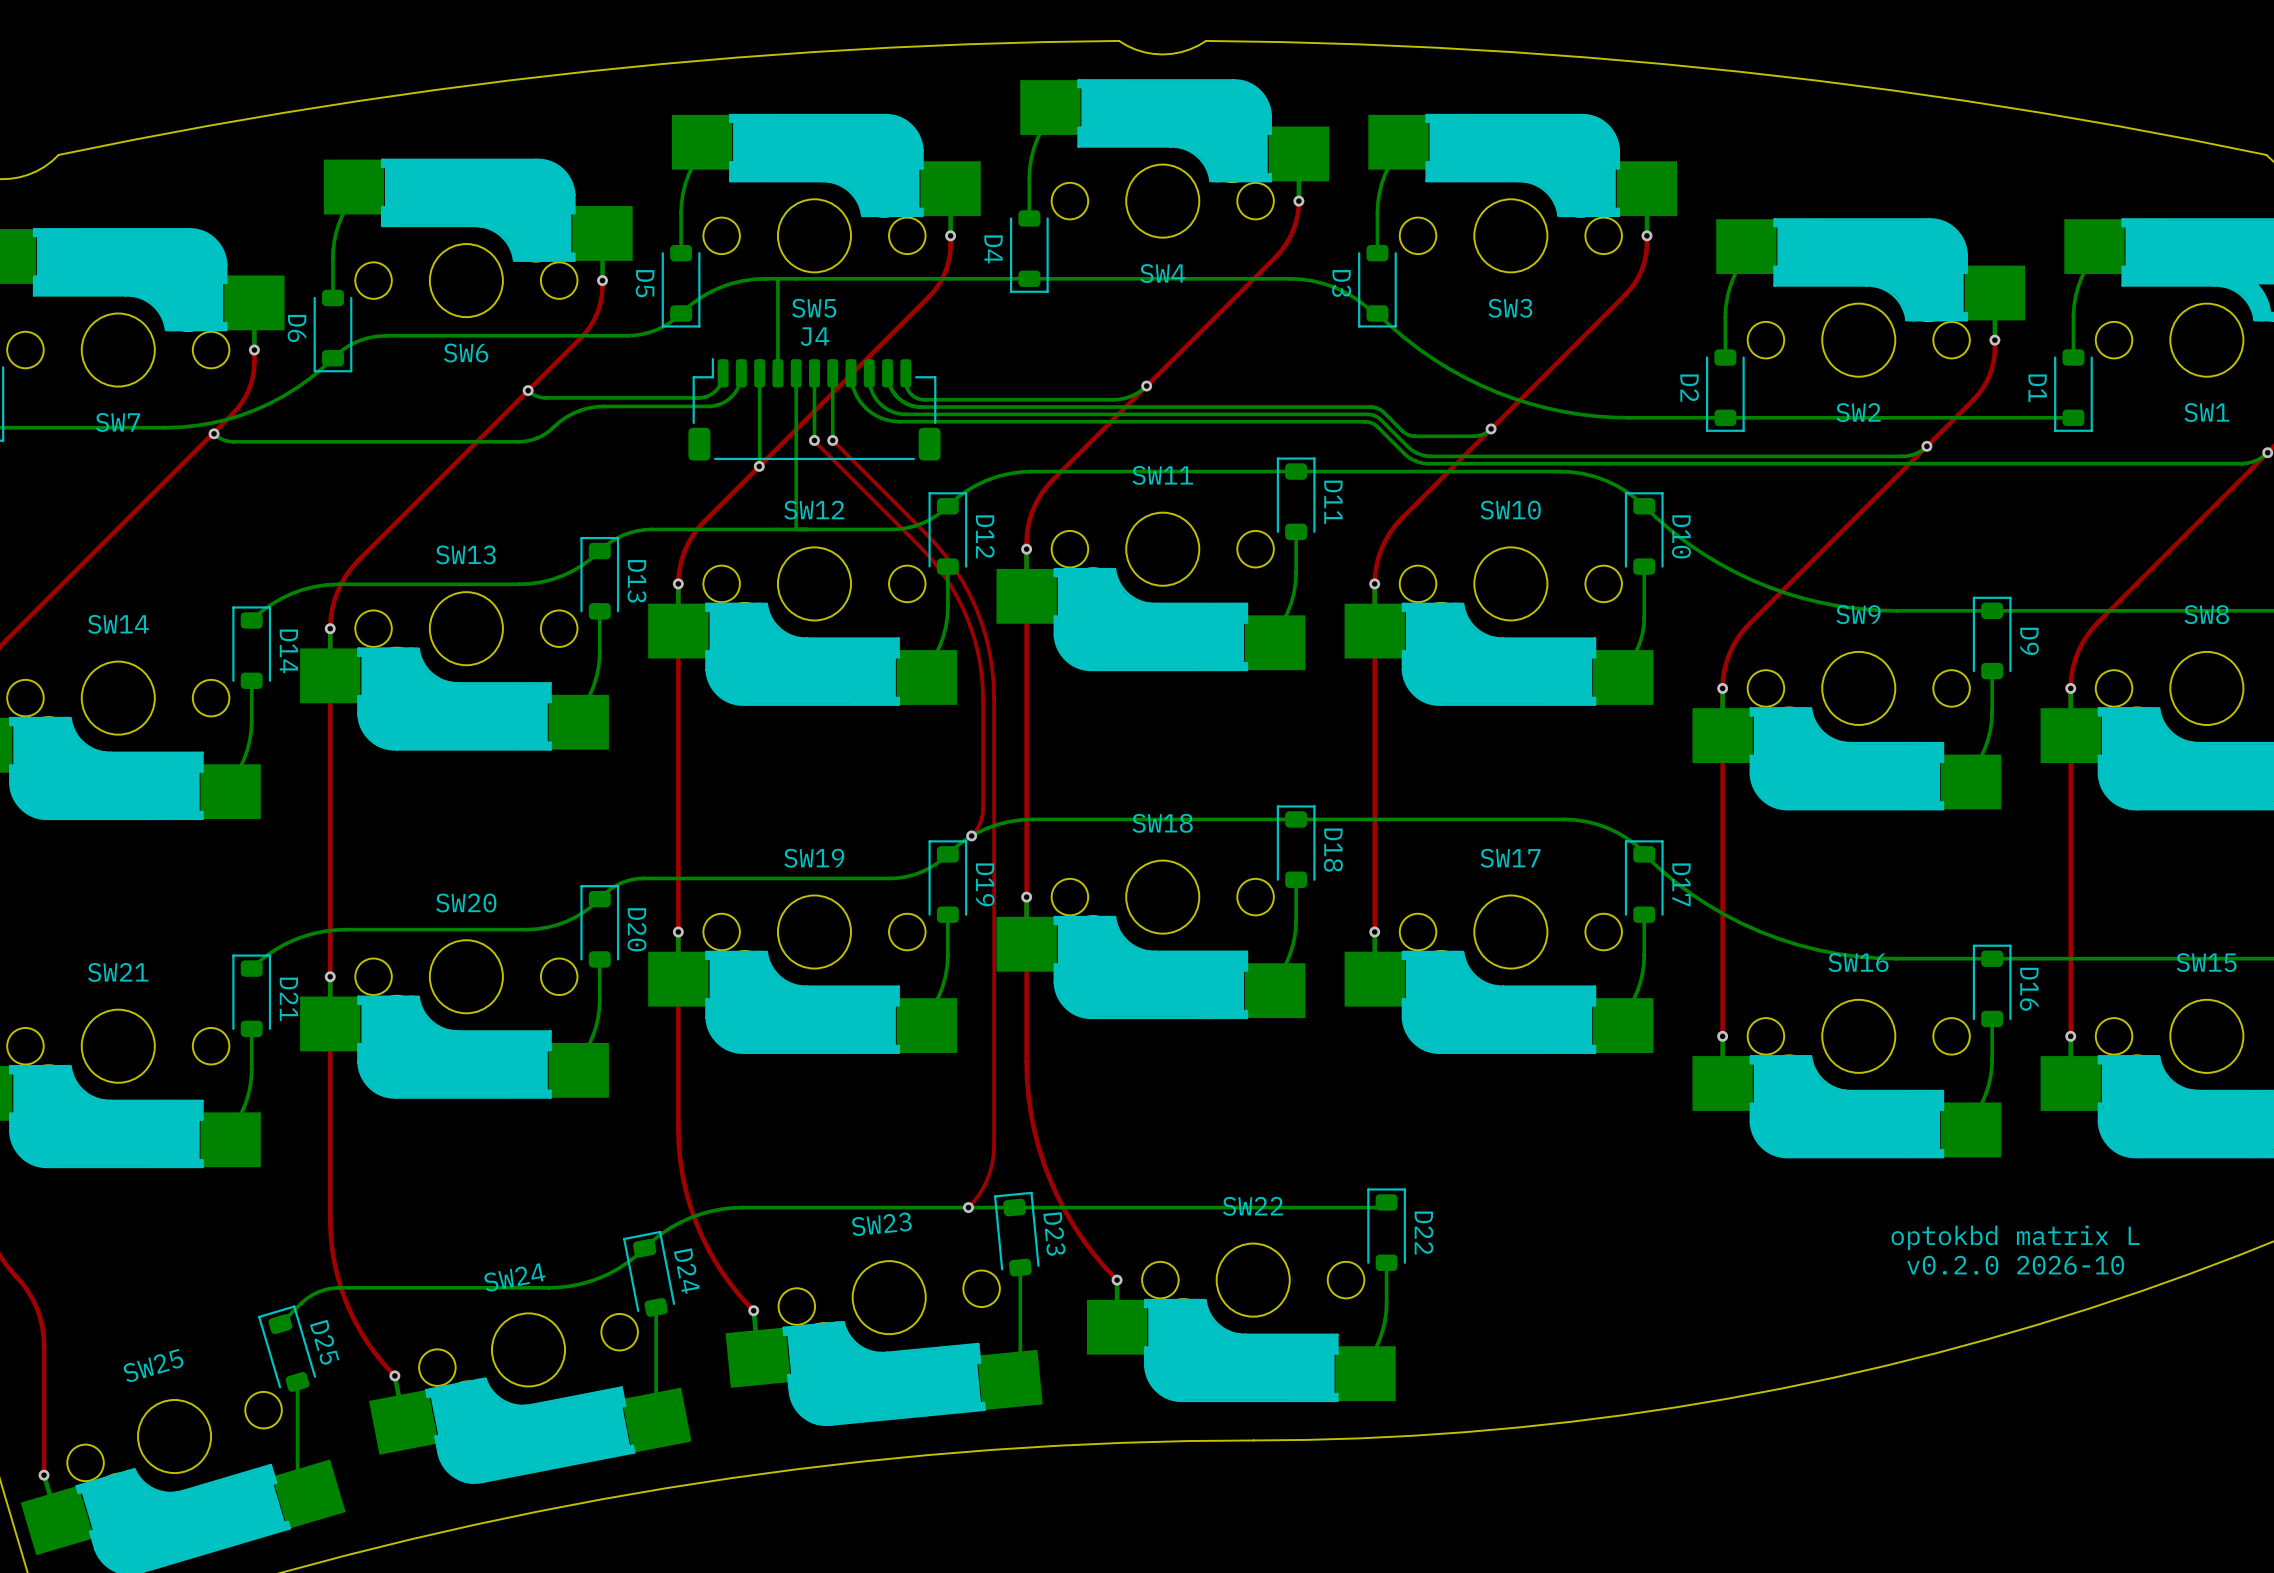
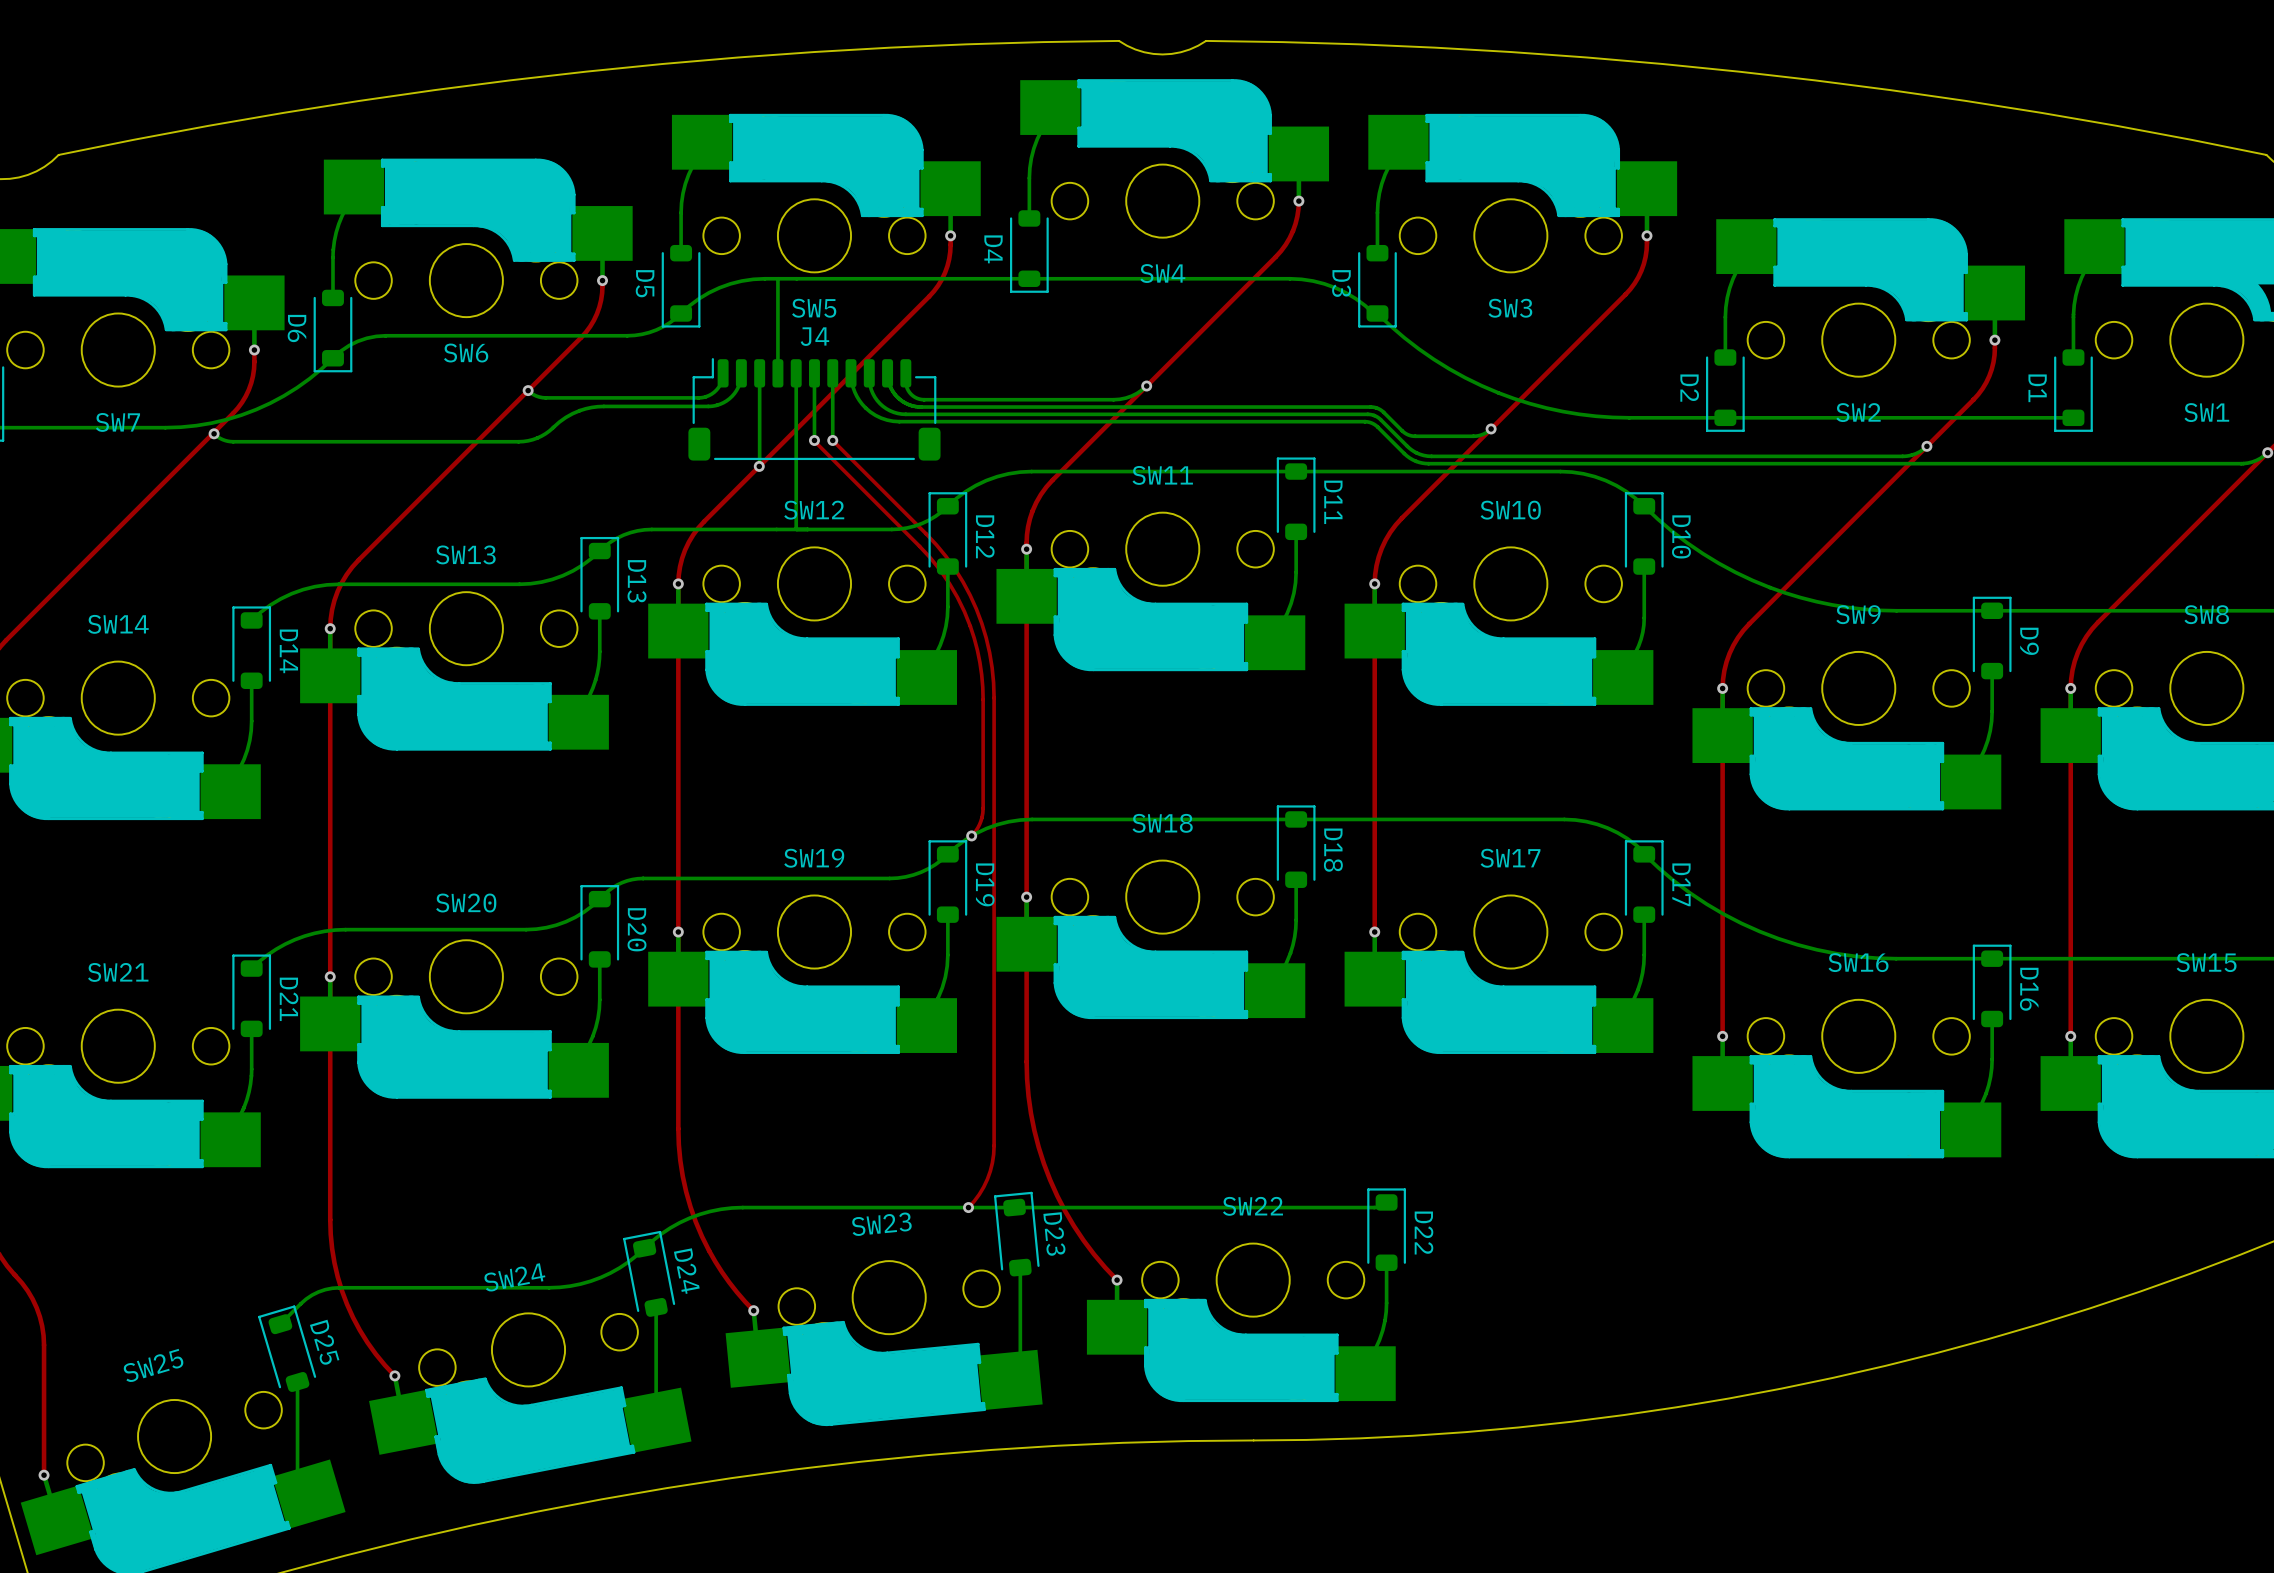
text: optokbd matrix L (2015, 1237) -> none
text: v0.2.0 2026-10 (2015, 1265) -> none

